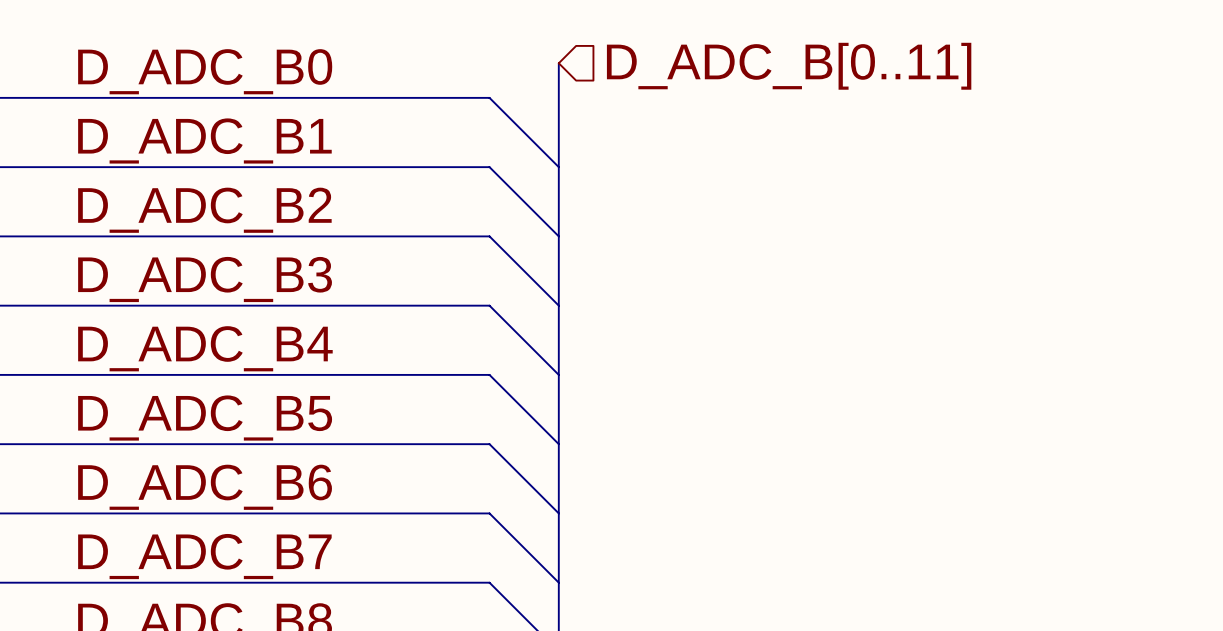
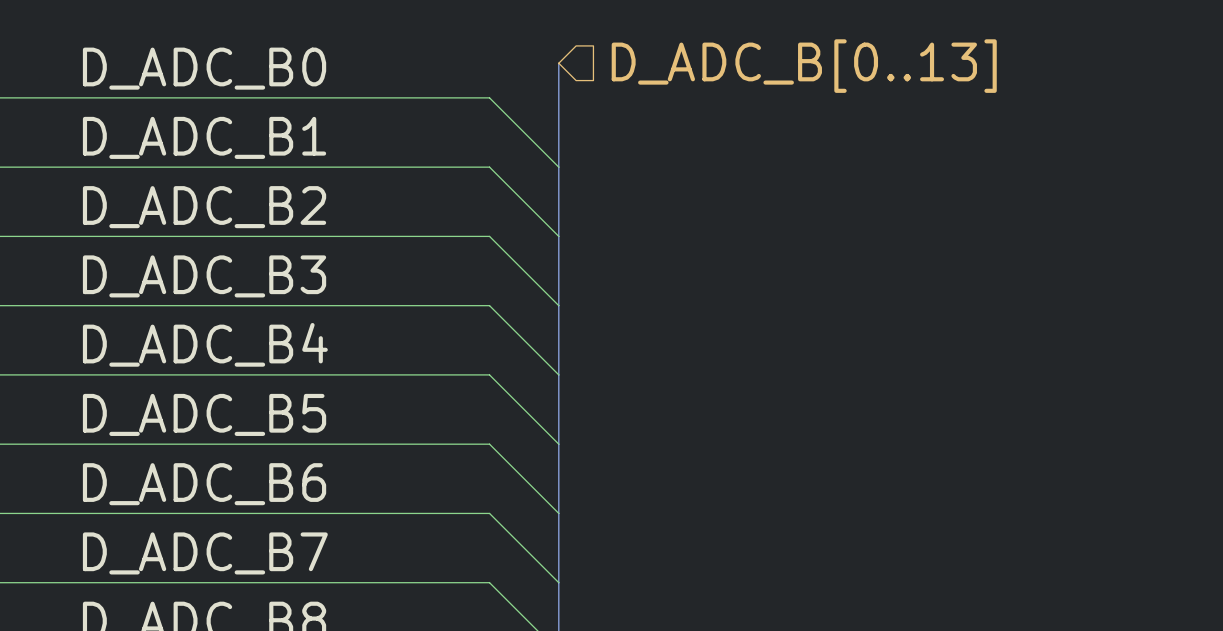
hierarchical label: D_ADC_B[0..11] (789, 66) -> D_ADC_B[0..13] (804, 66)

